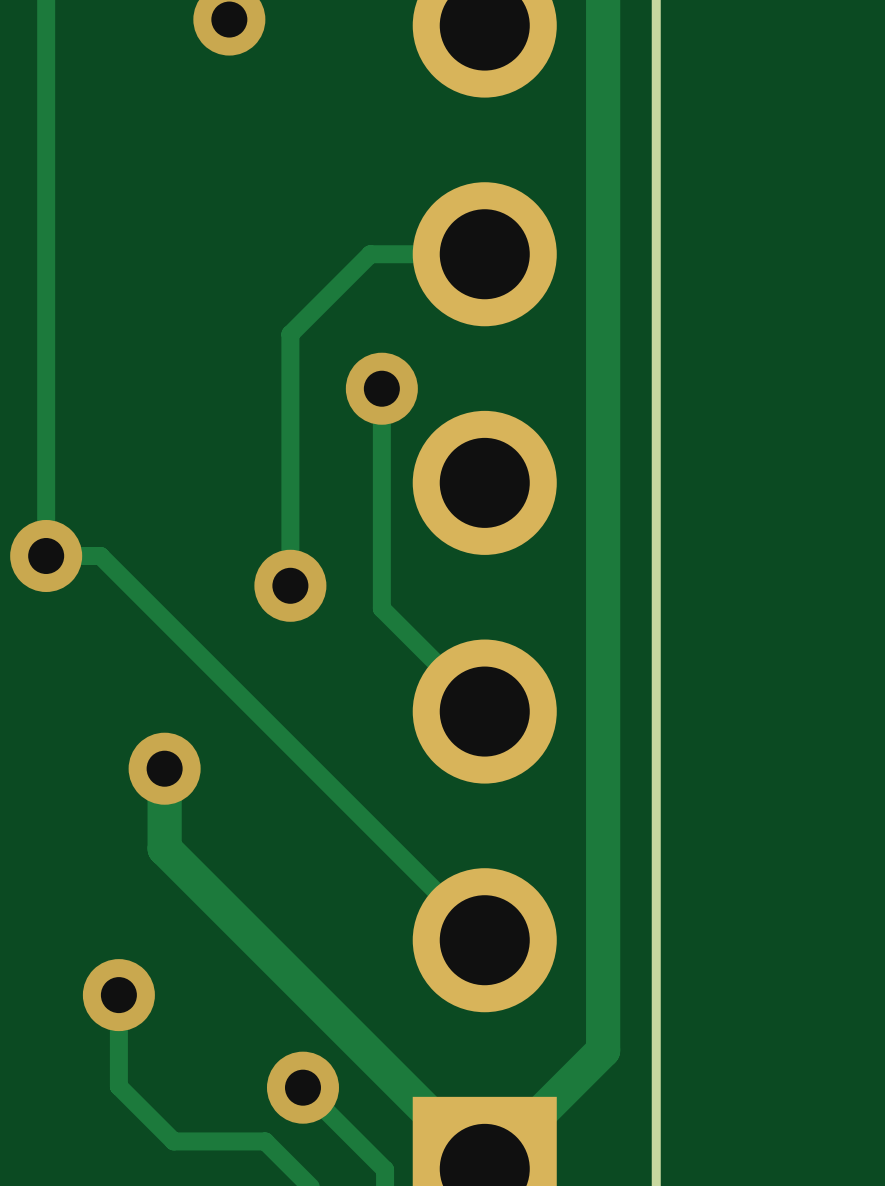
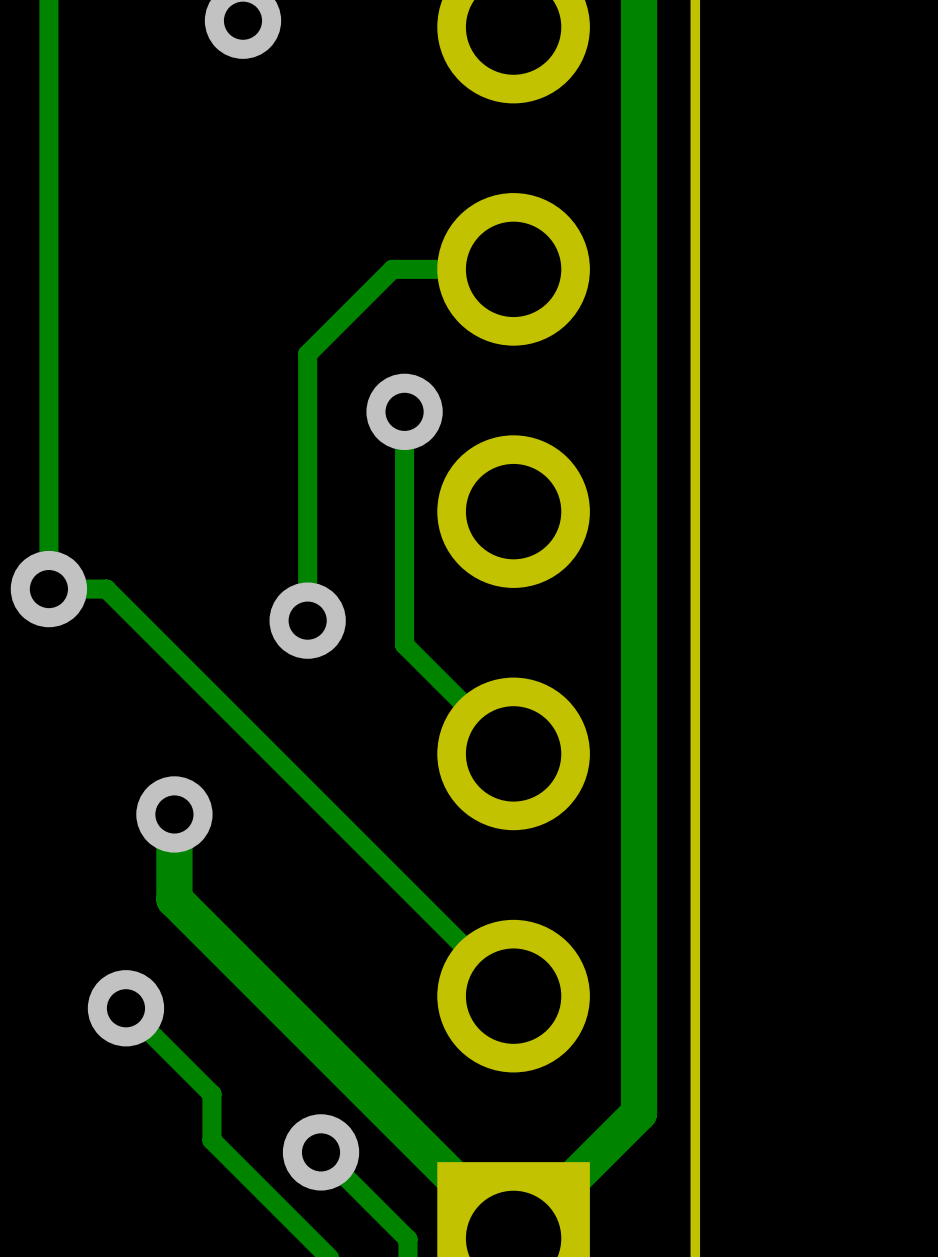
track: (118, 995) (118, 1086) (173, 1141) (265, 1141) -> (125, 1008) (211, 1094) (211, 1140) (281, 1209)
via position: (118, 995) -> (125, 1008)

